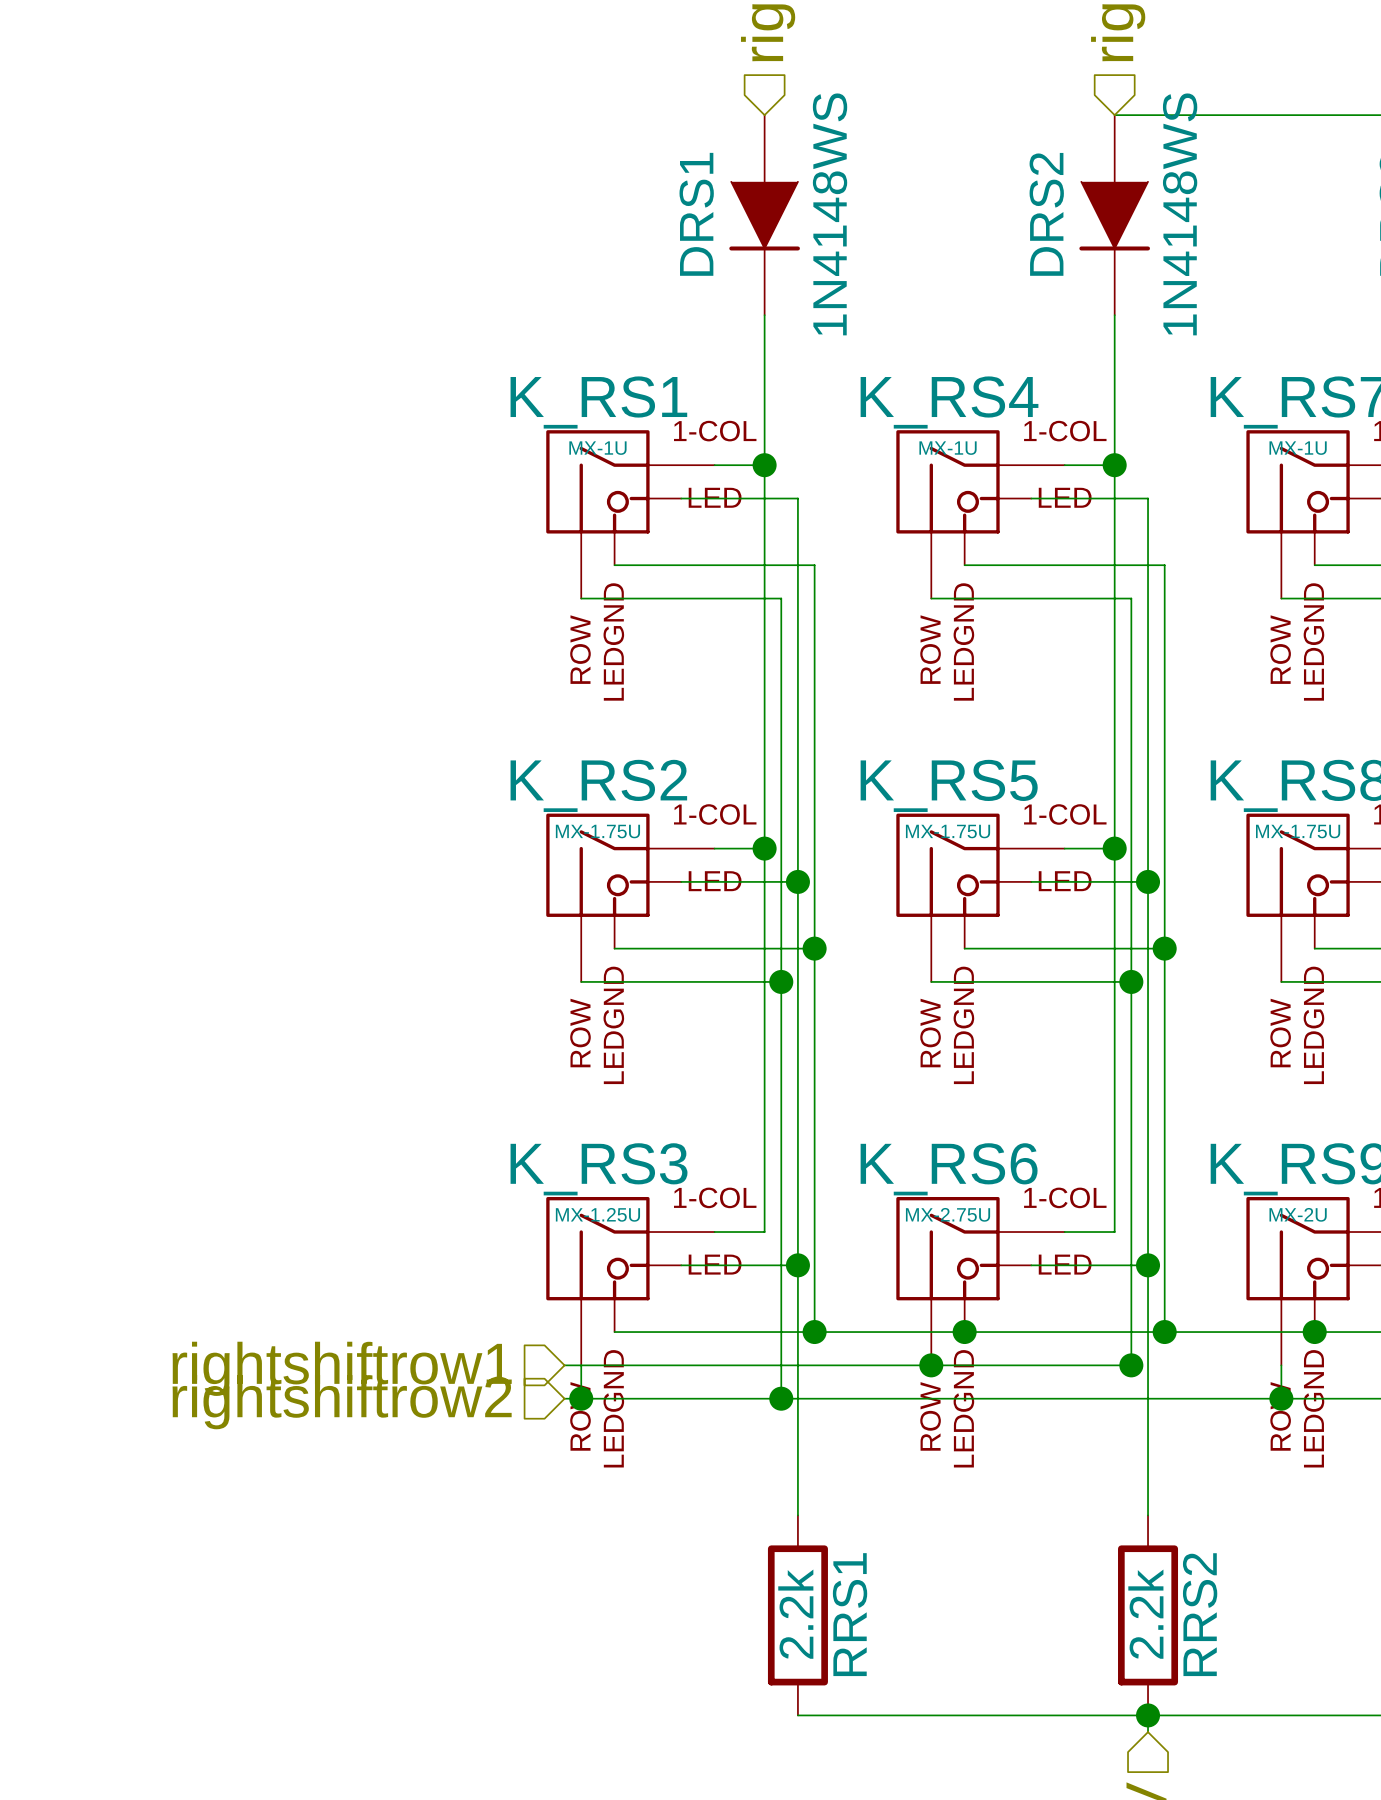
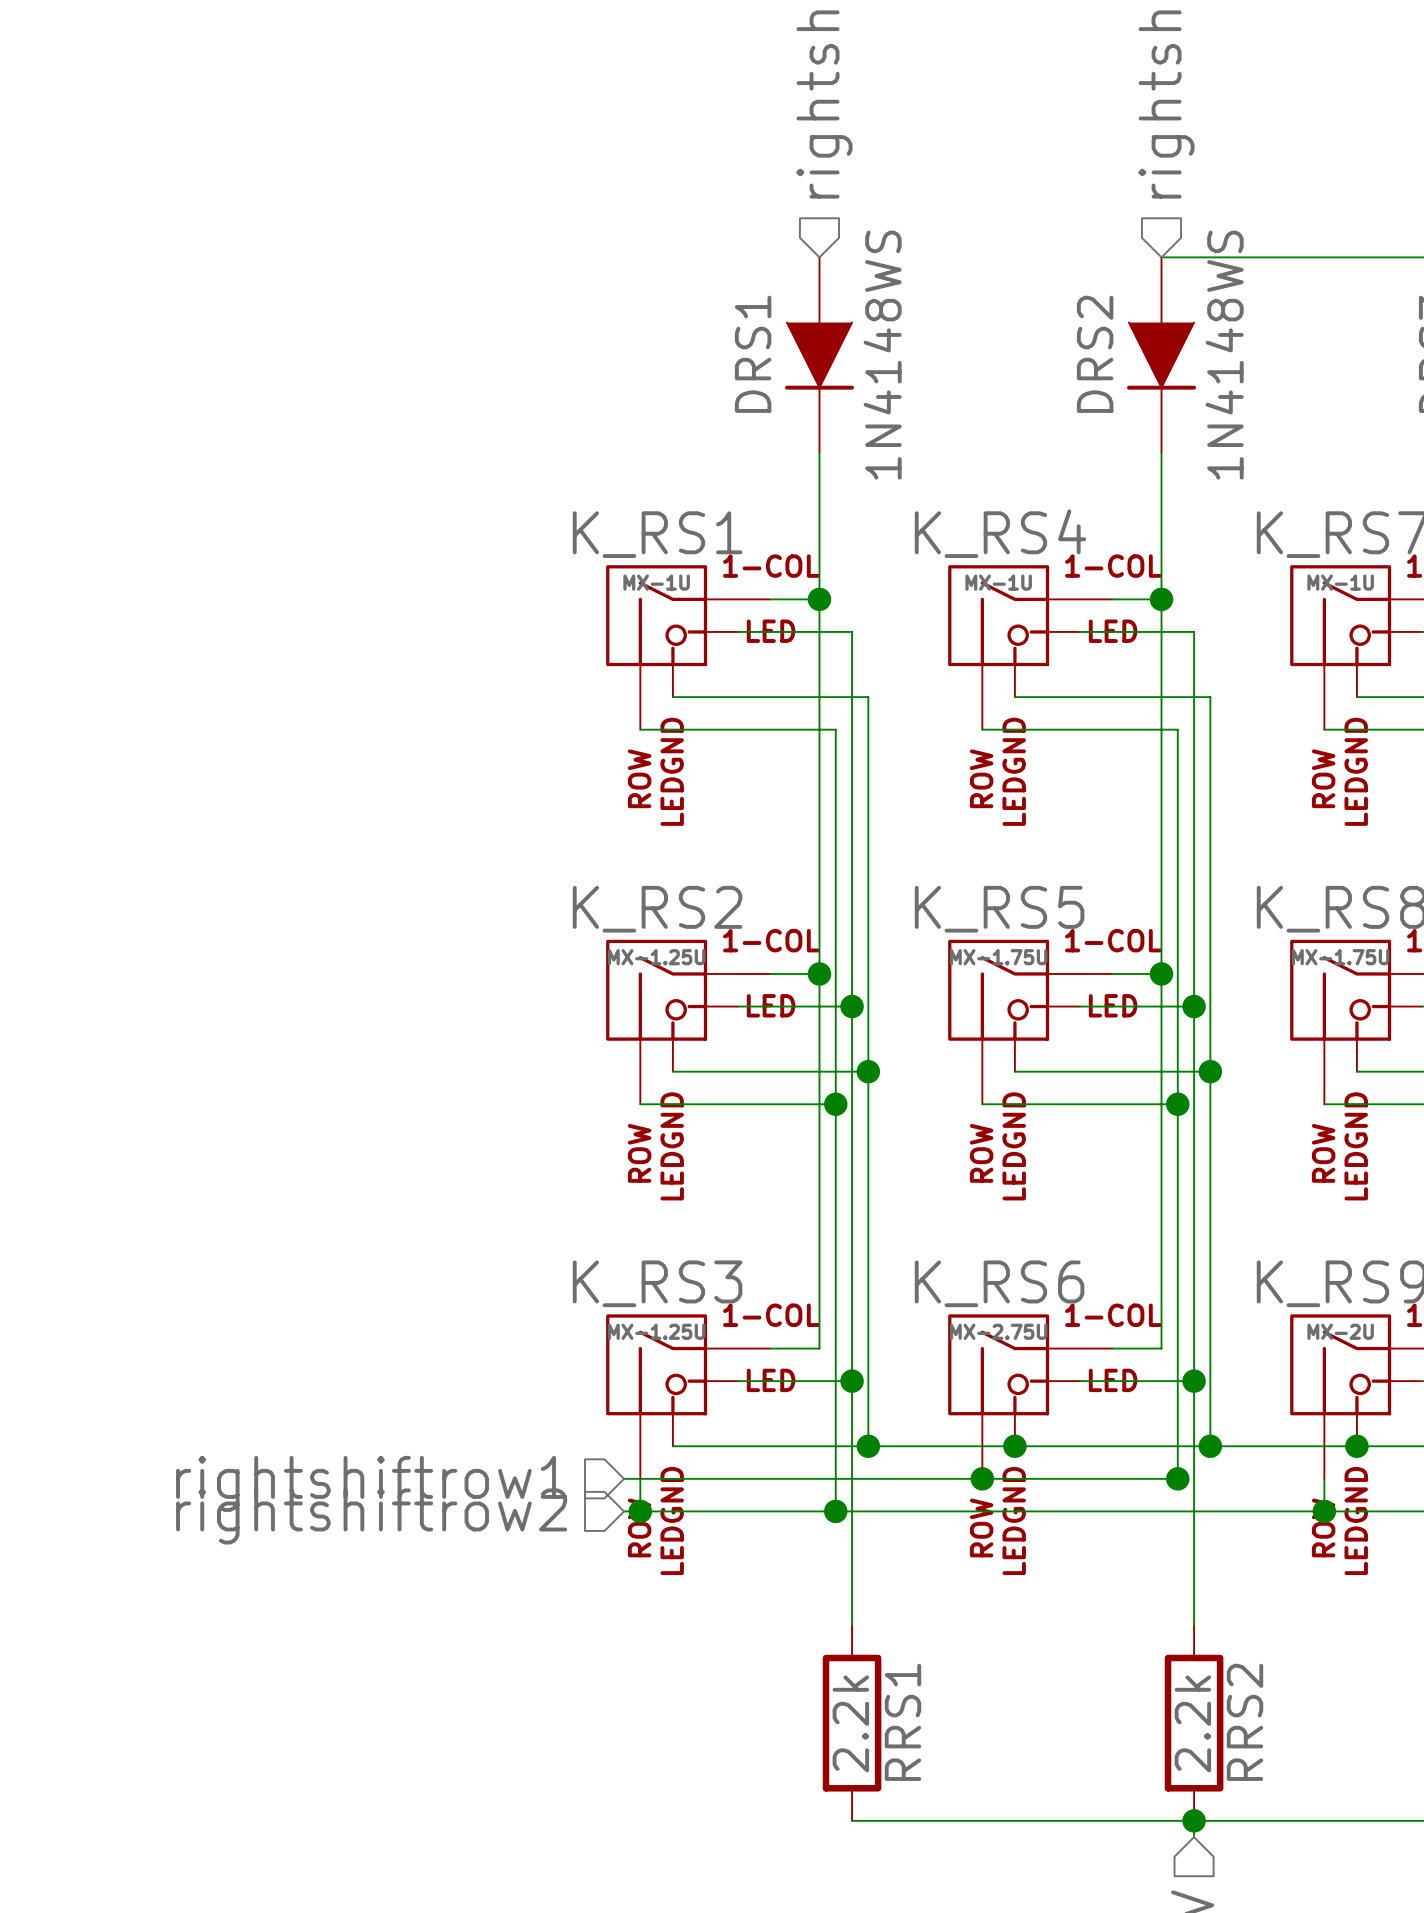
K_RS2 value: MX-1.75U (597, 831) -> MX-1.25U (656, 957)

